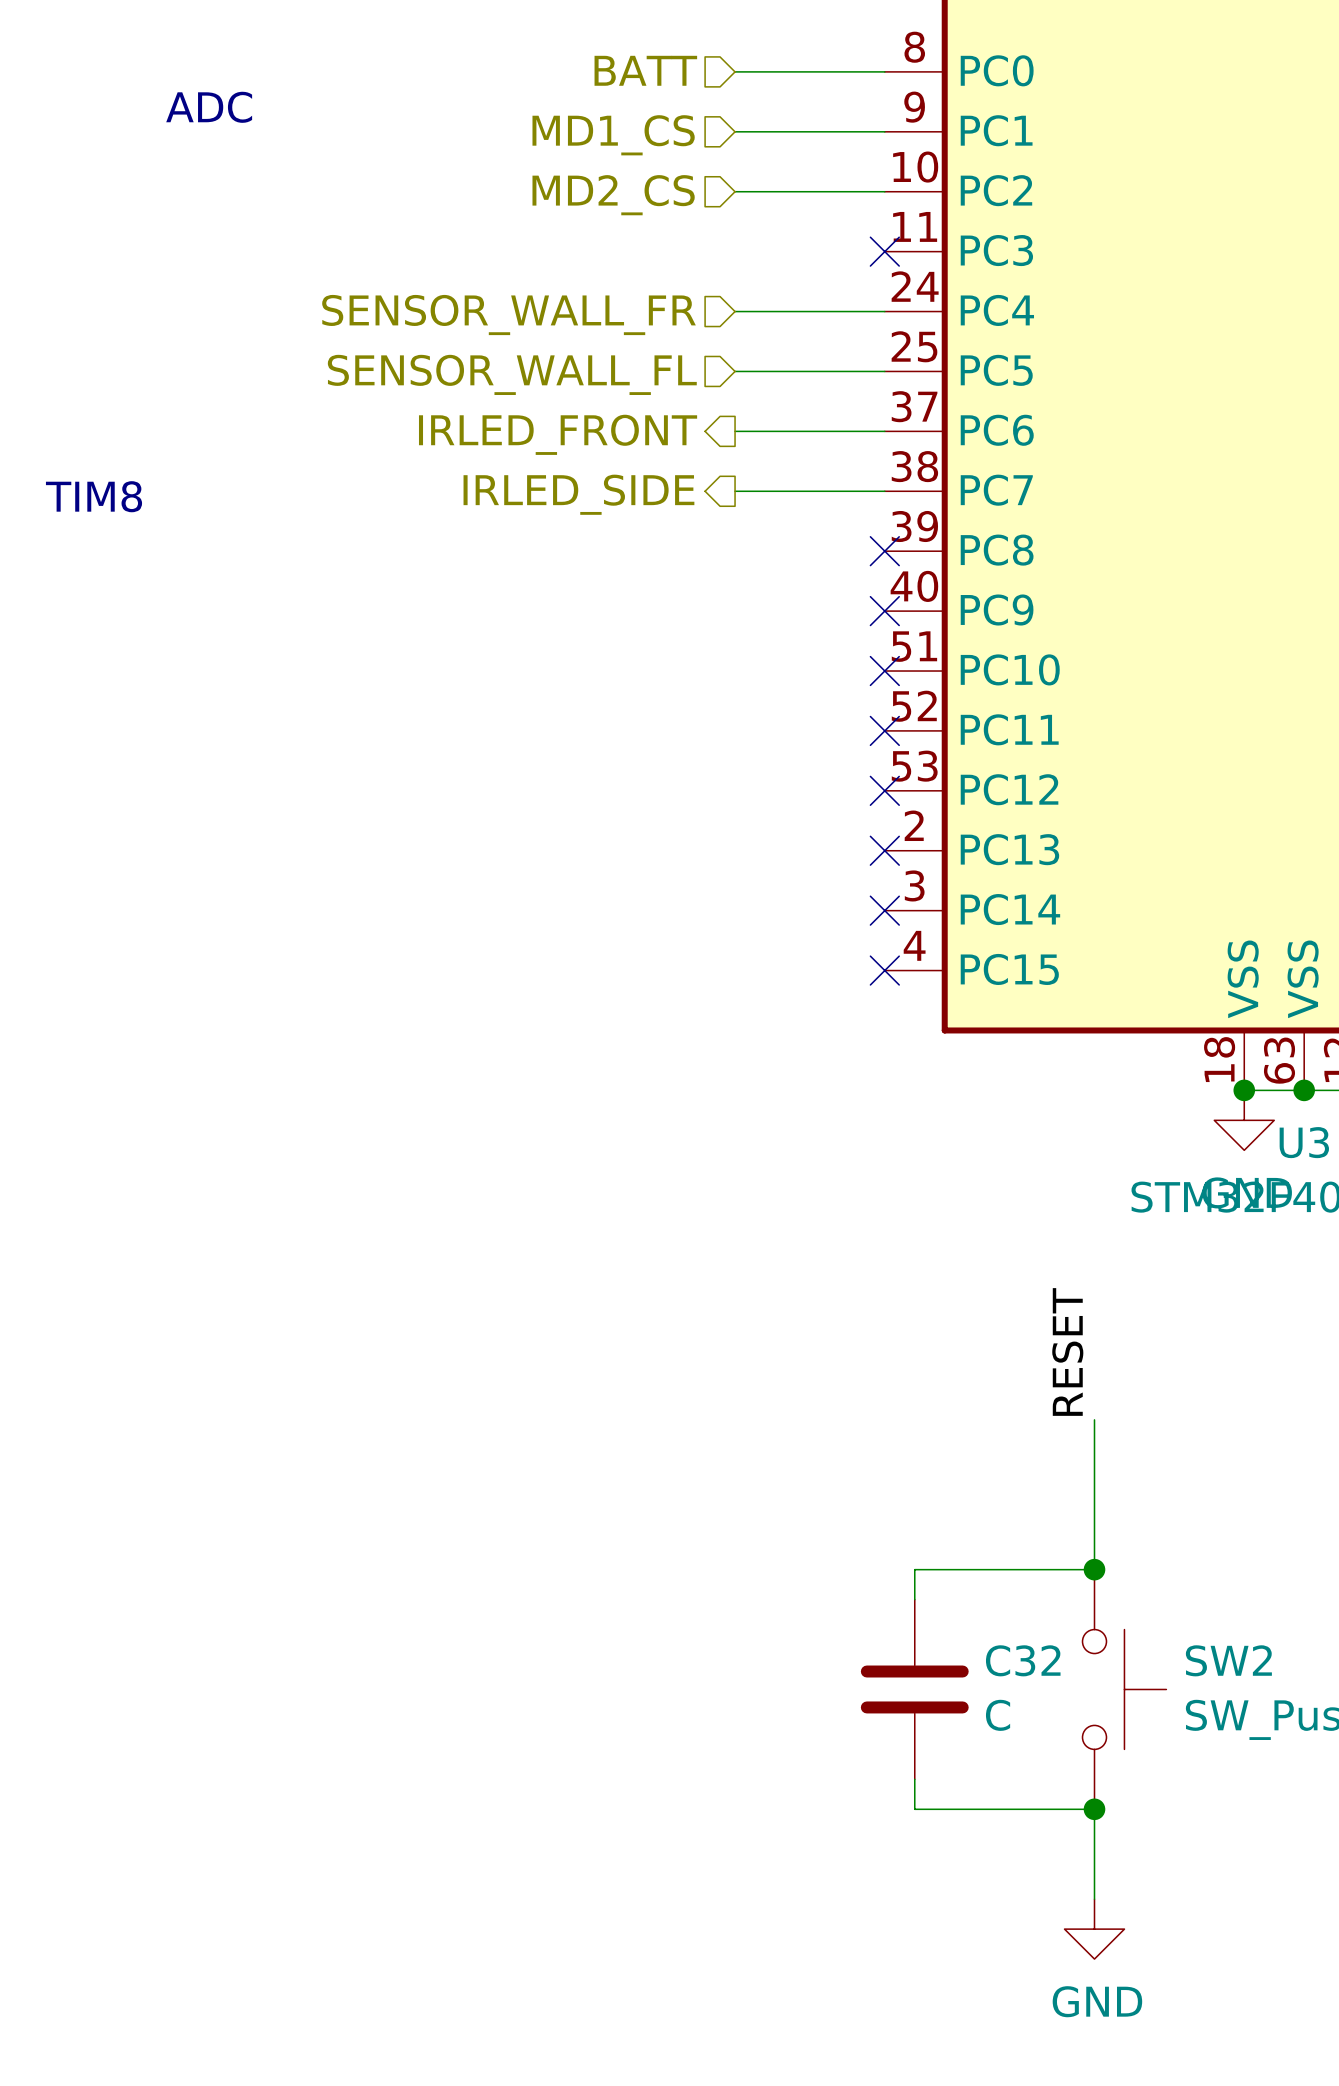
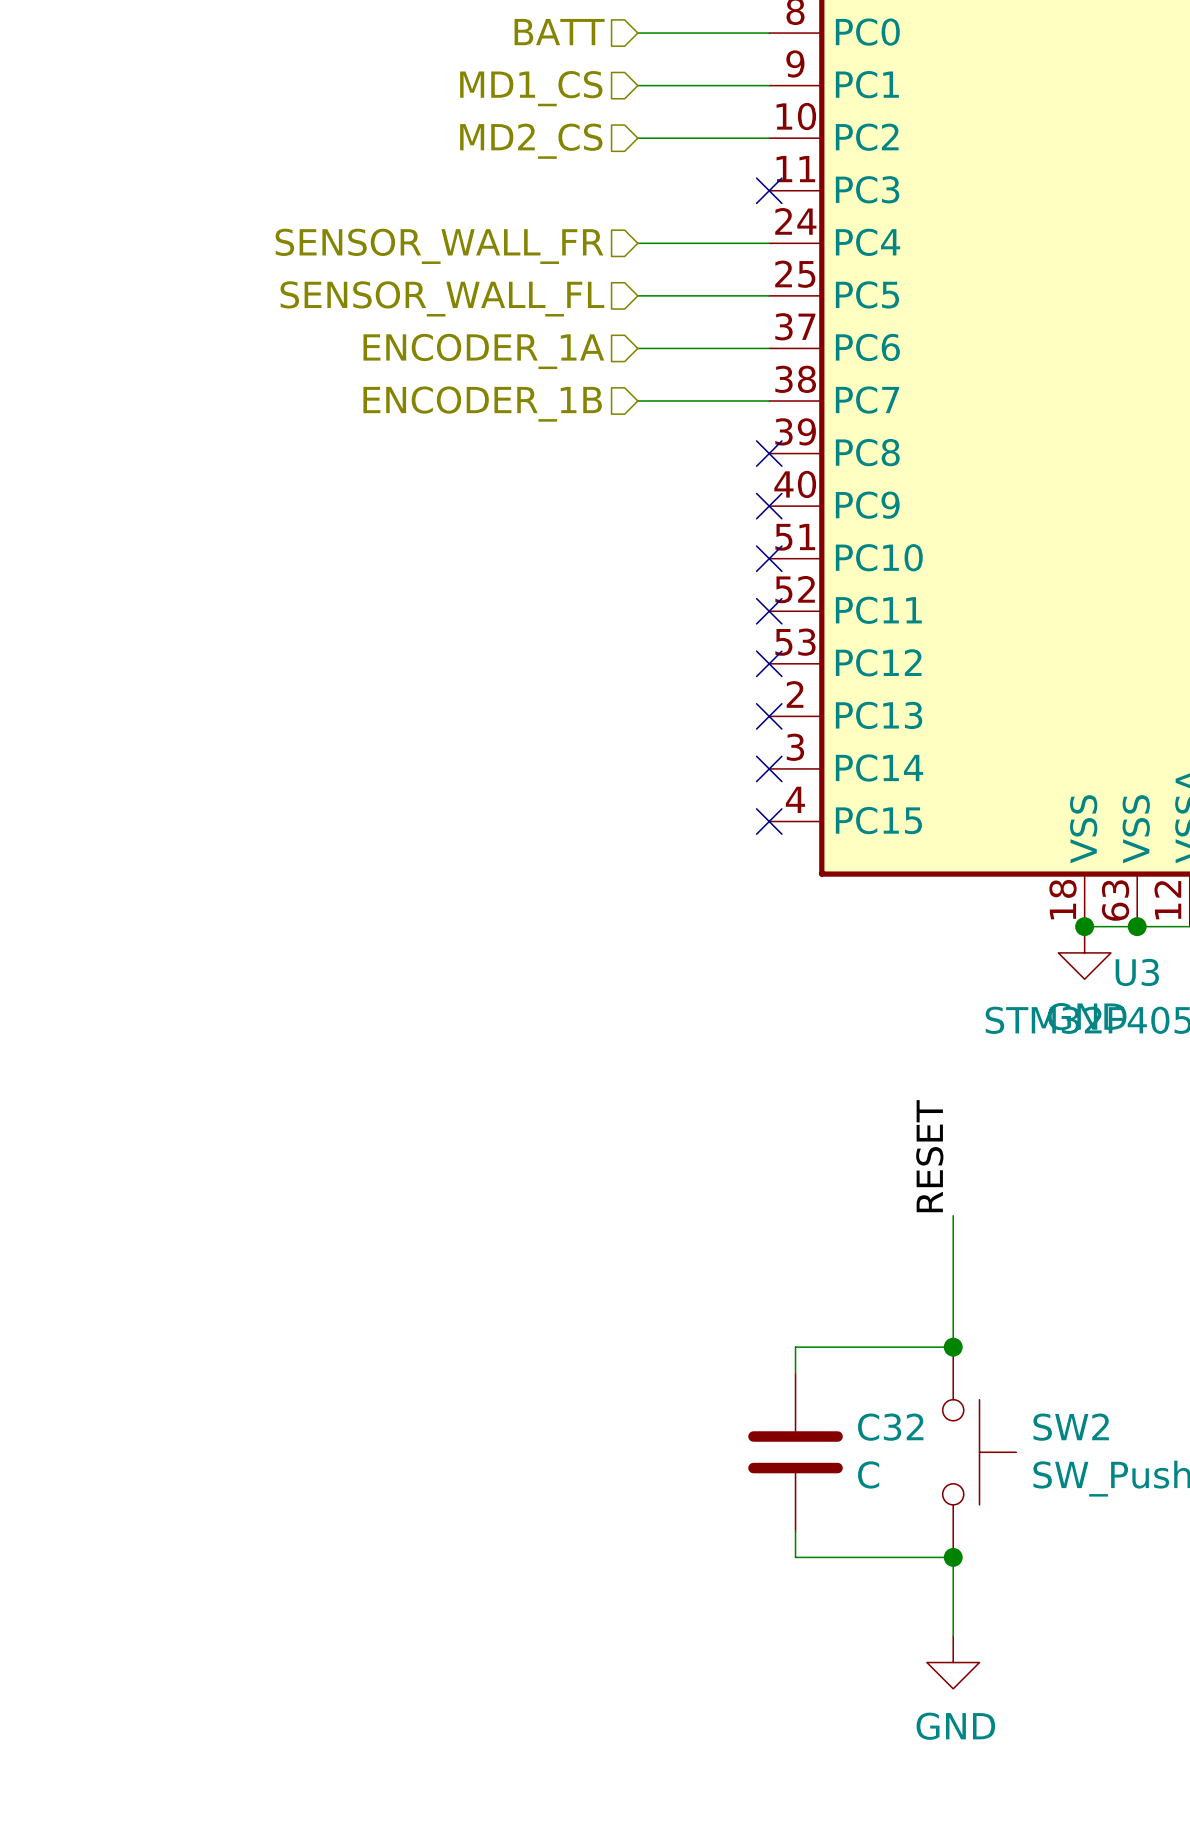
text: ADC (209, 107) -> none
hierarchical label shape: output (558, 434) -> input (483, 351)
hierarchical label: IRLED_FRONT (558, 434) -> ENCODER_1A (483, 351)
hierarchical label shape: output (578, 494) -> input (482, 404)
hierarchical label: IRLED_SIDE (578, 494) -> ENCODER_1B (482, 404)
text: TIM8 (94, 496) -> none

